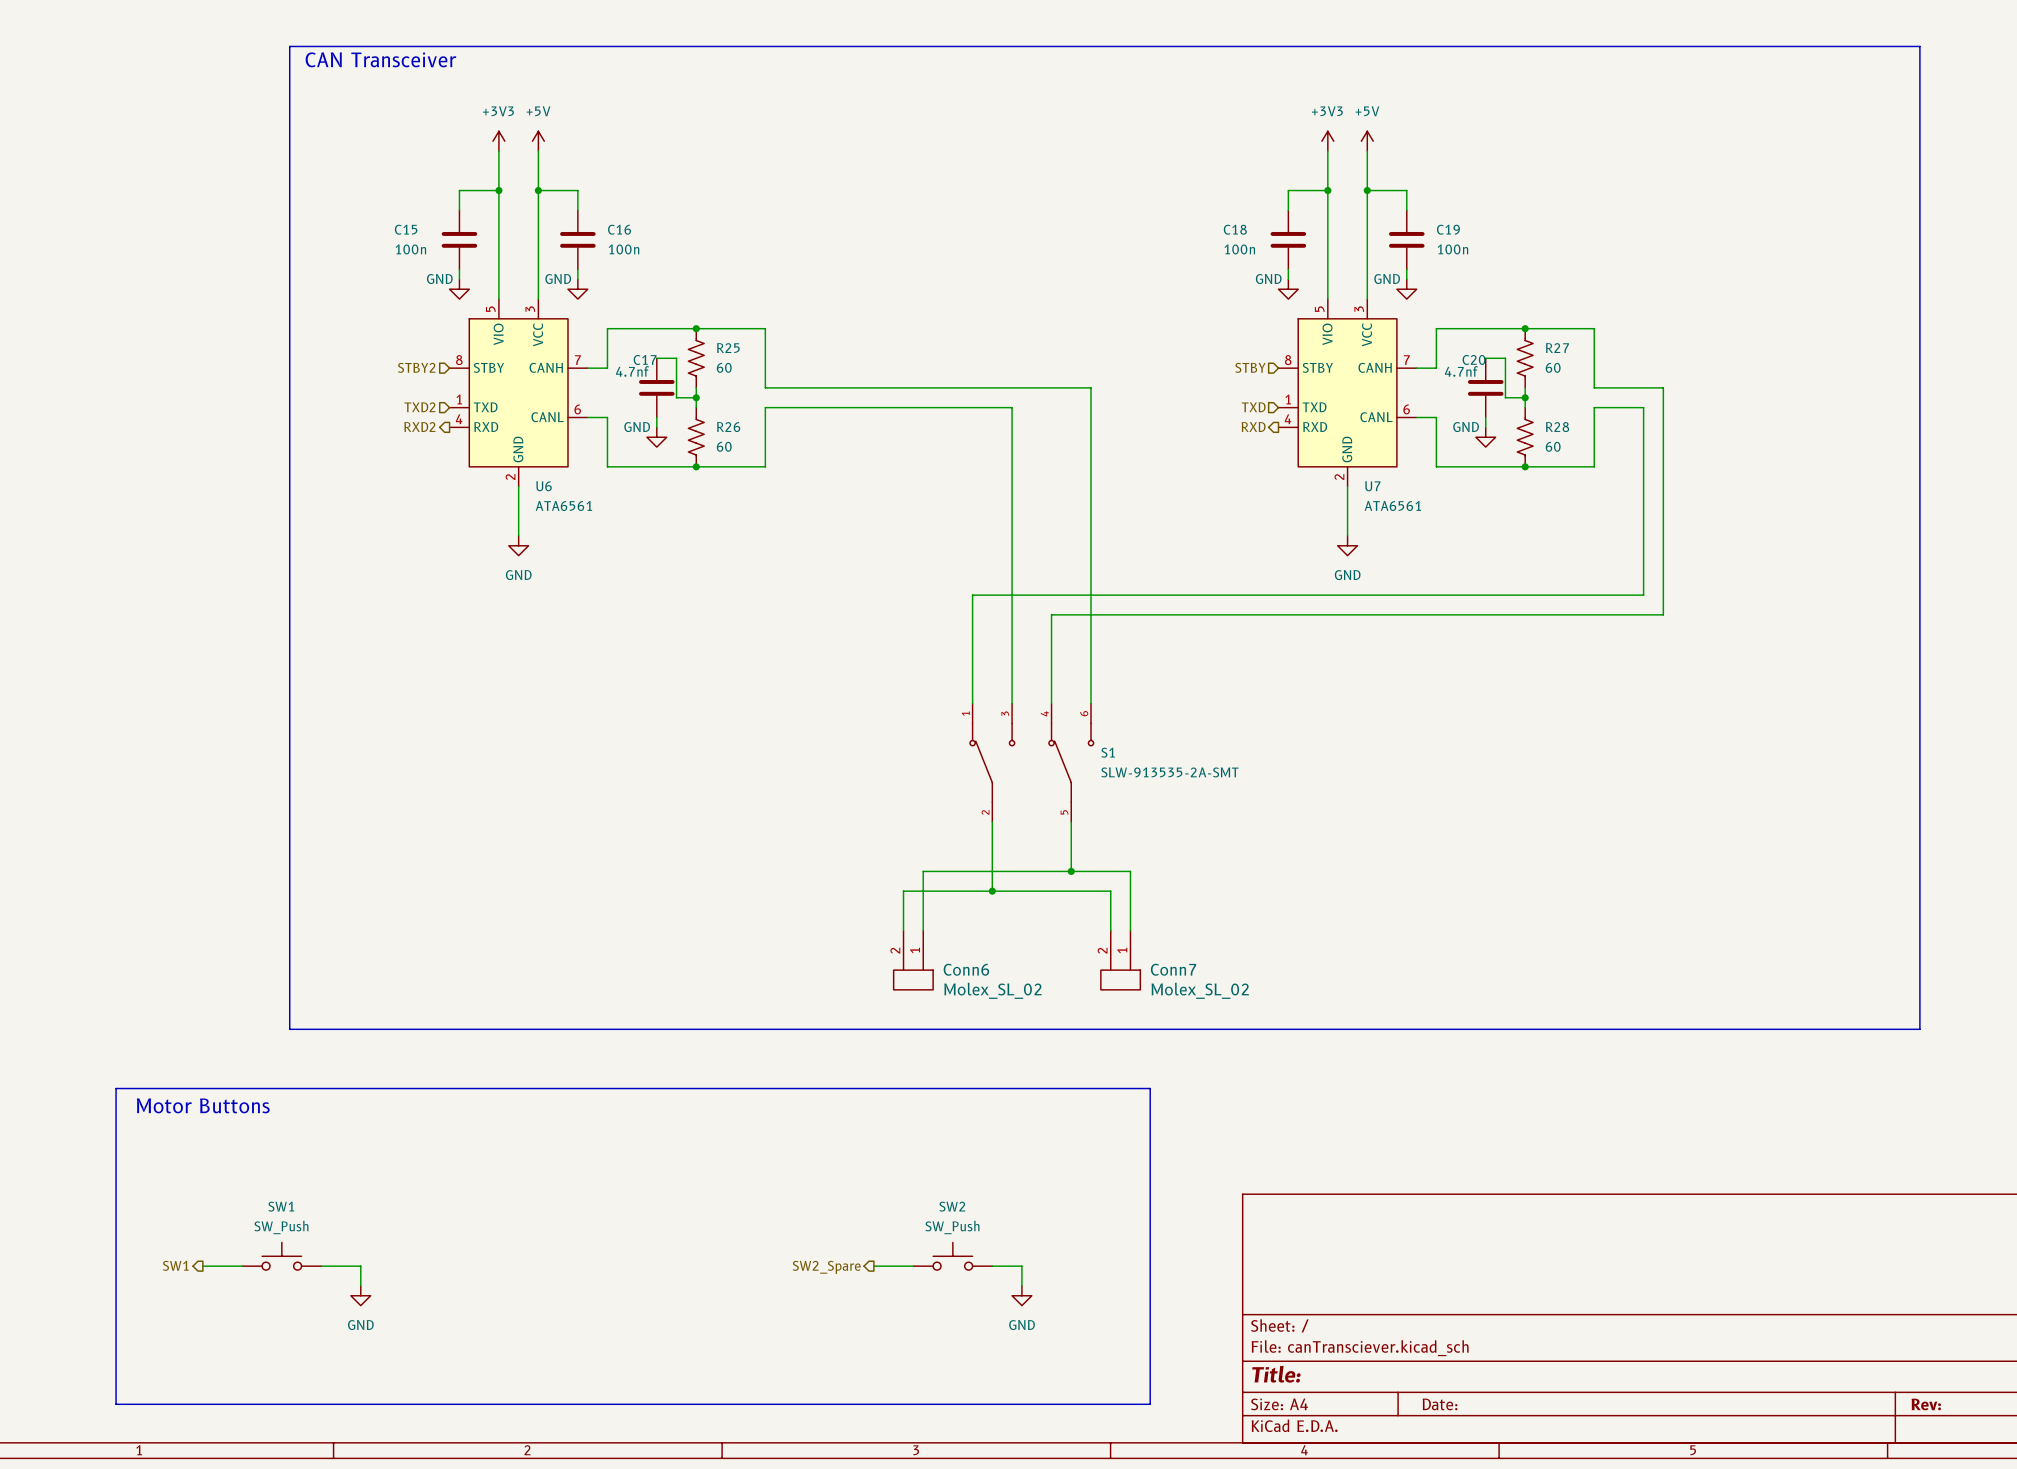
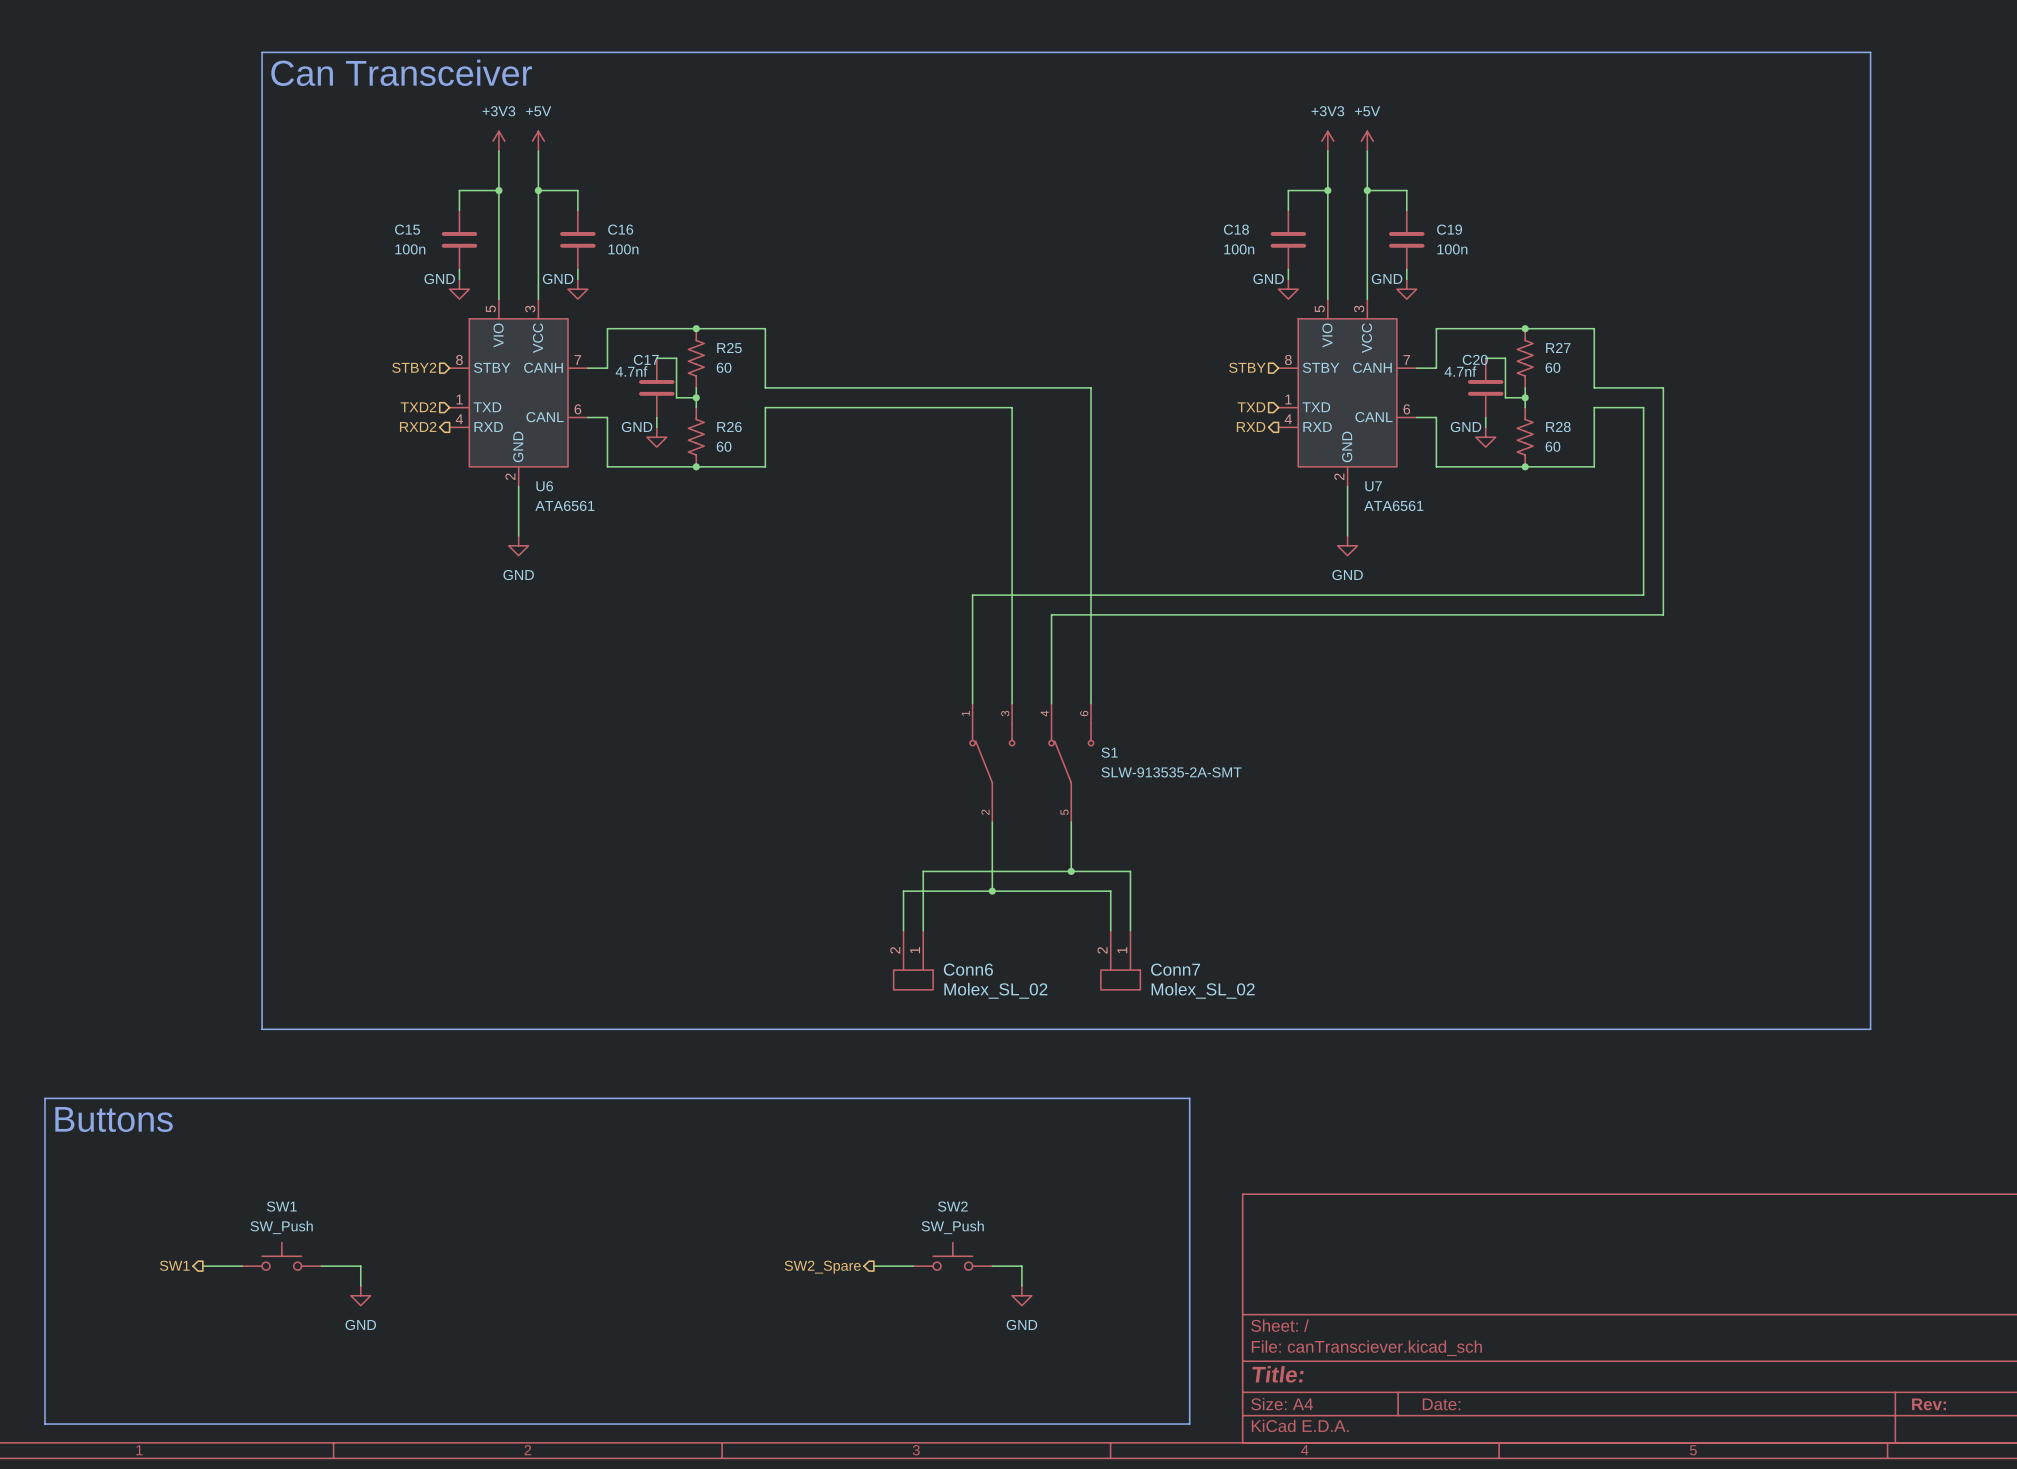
text: CAN Transceiver (380, 59) -> Can Transceiver (401, 72)
line: (289, 1029) (289, 46) (1919, 46) (1919, 1029) (1870, 1029) -> (289, 1029) (262, 1029) (262, 52) (1870, 52) (1870, 1029)
line: (116, 1088) (1150, 1088) (1150, 1404) (116, 1404) (116, 1088) -> (44, 1098) (44, 1424) (1189, 1424) (1189, 1098) (44, 1098)
text: Motor Buttons (203, 1105) -> Buttons (114, 1119)

